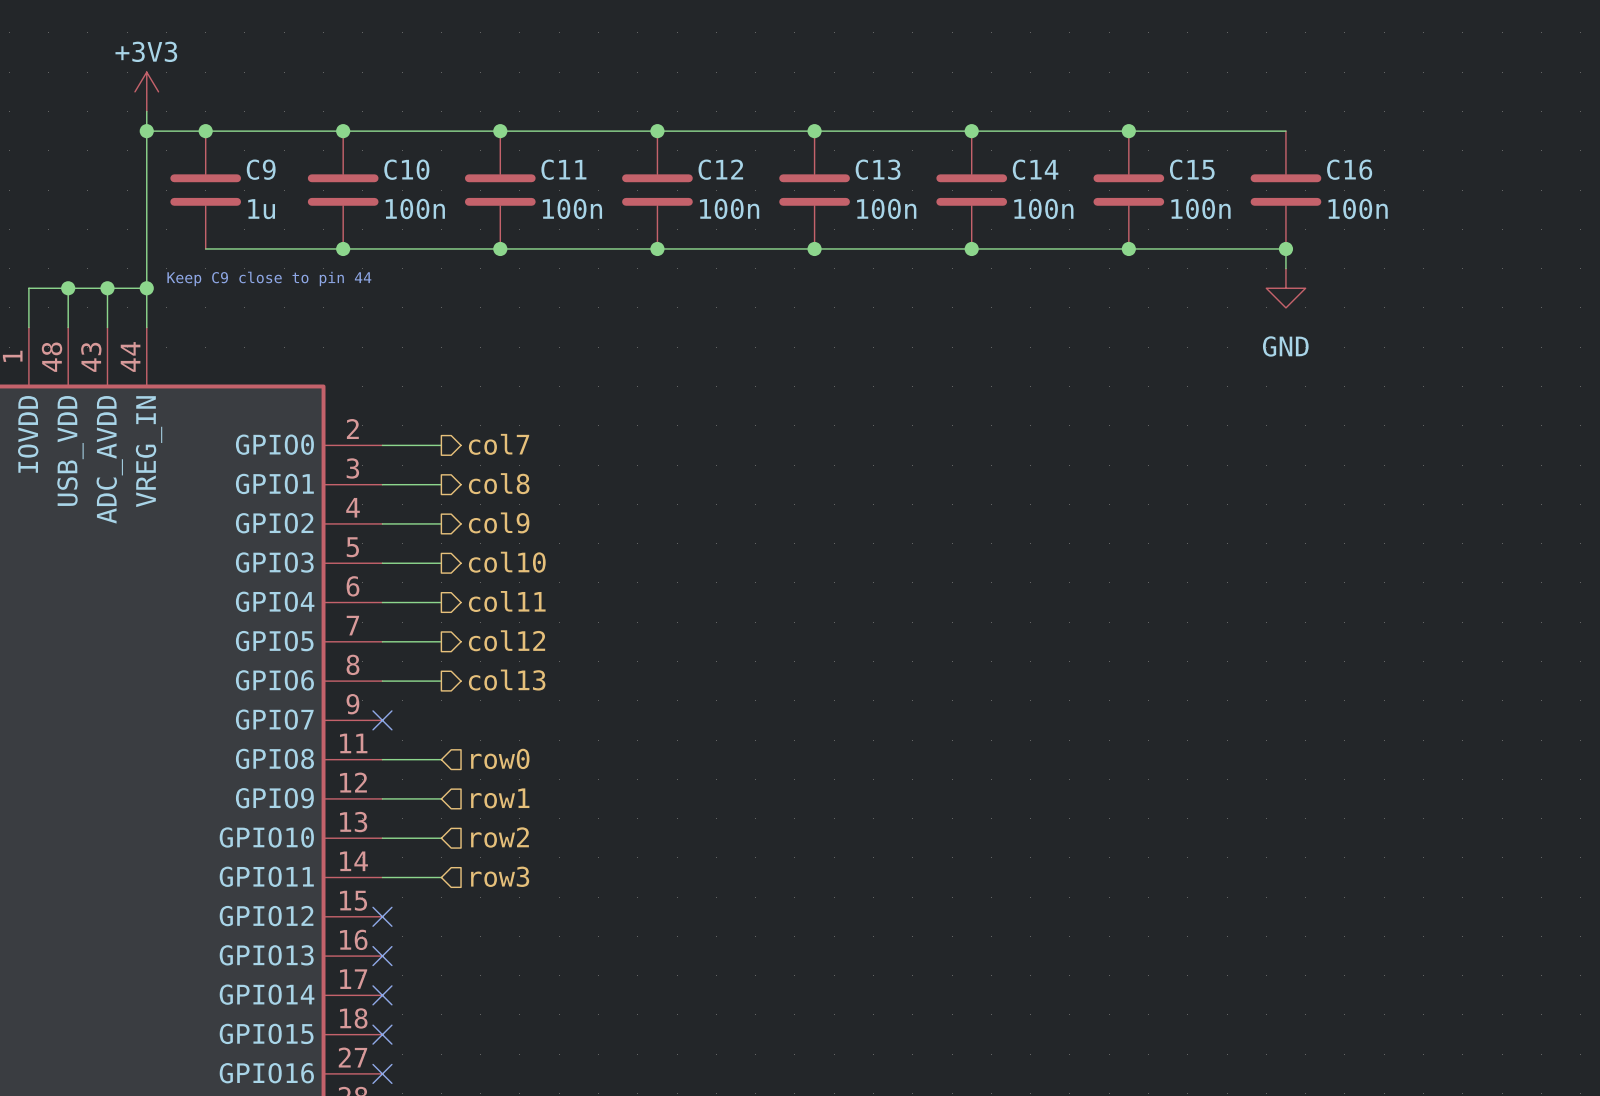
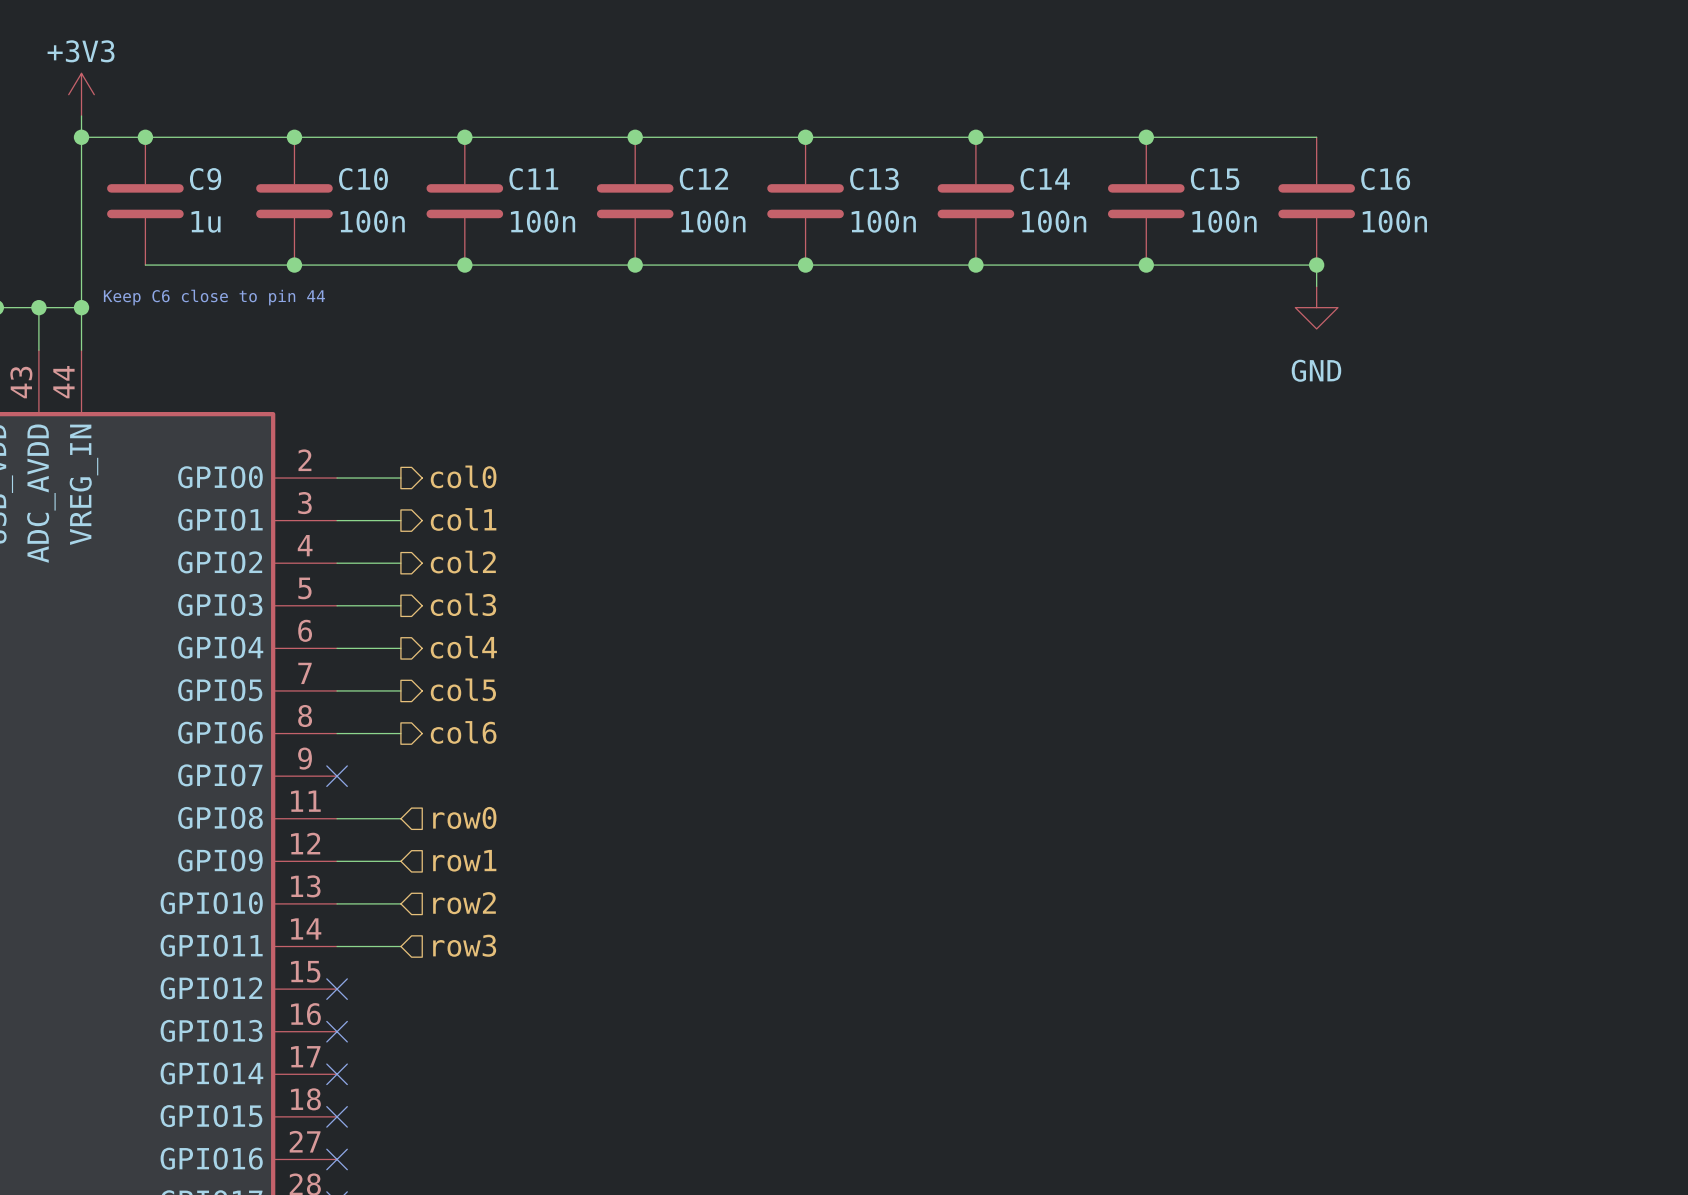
text: Keep C9 close to pin 44 (269, 278) -> Keep C6 close to pin 44 (214, 297)
hierarchical label: col7 (499, 444) -> col0 (463, 476)
hierarchical label: col8 (499, 483) -> col1 (463, 519)
hierarchical label: col9 (499, 522) -> col2 (463, 562)
hierarchical label: col10 (507, 562) -> col3 (463, 604)
hierarchical label: col11 (507, 601) -> col4 (463, 647)
hierarchical label: col12 (507, 640) -> col5 (463, 689)
hierarchical label: col13 (507, 680) -> col6 (463, 732)

